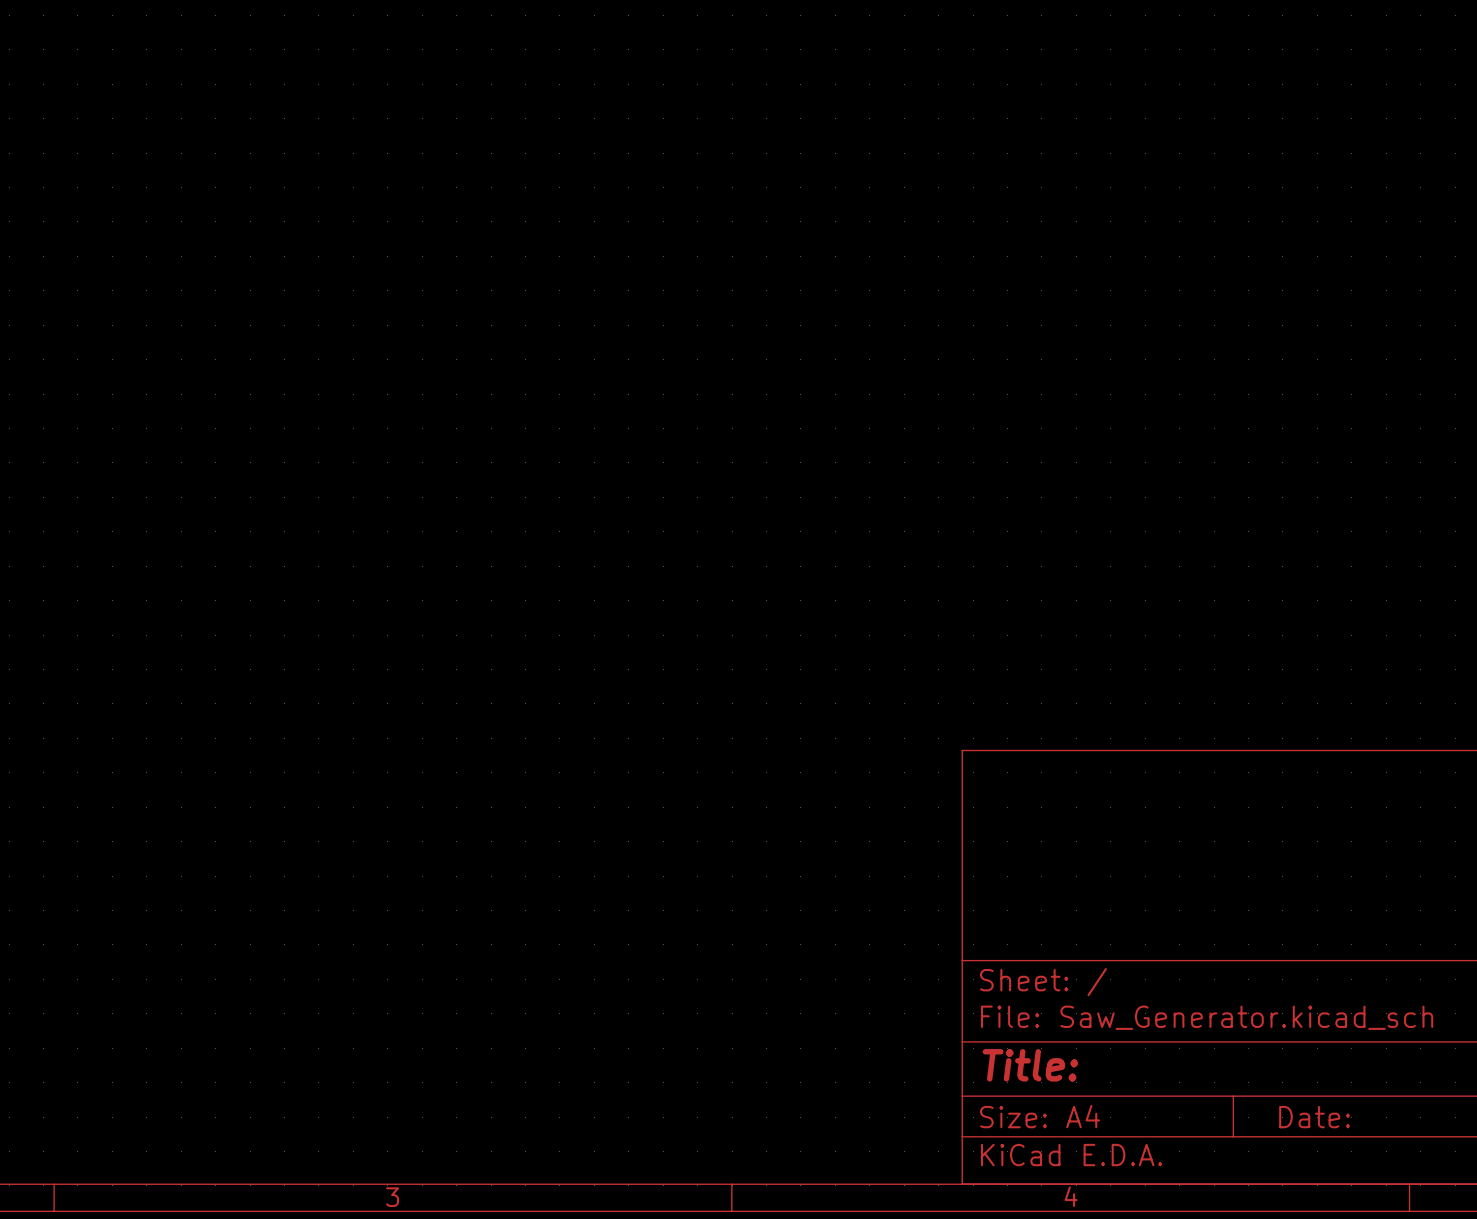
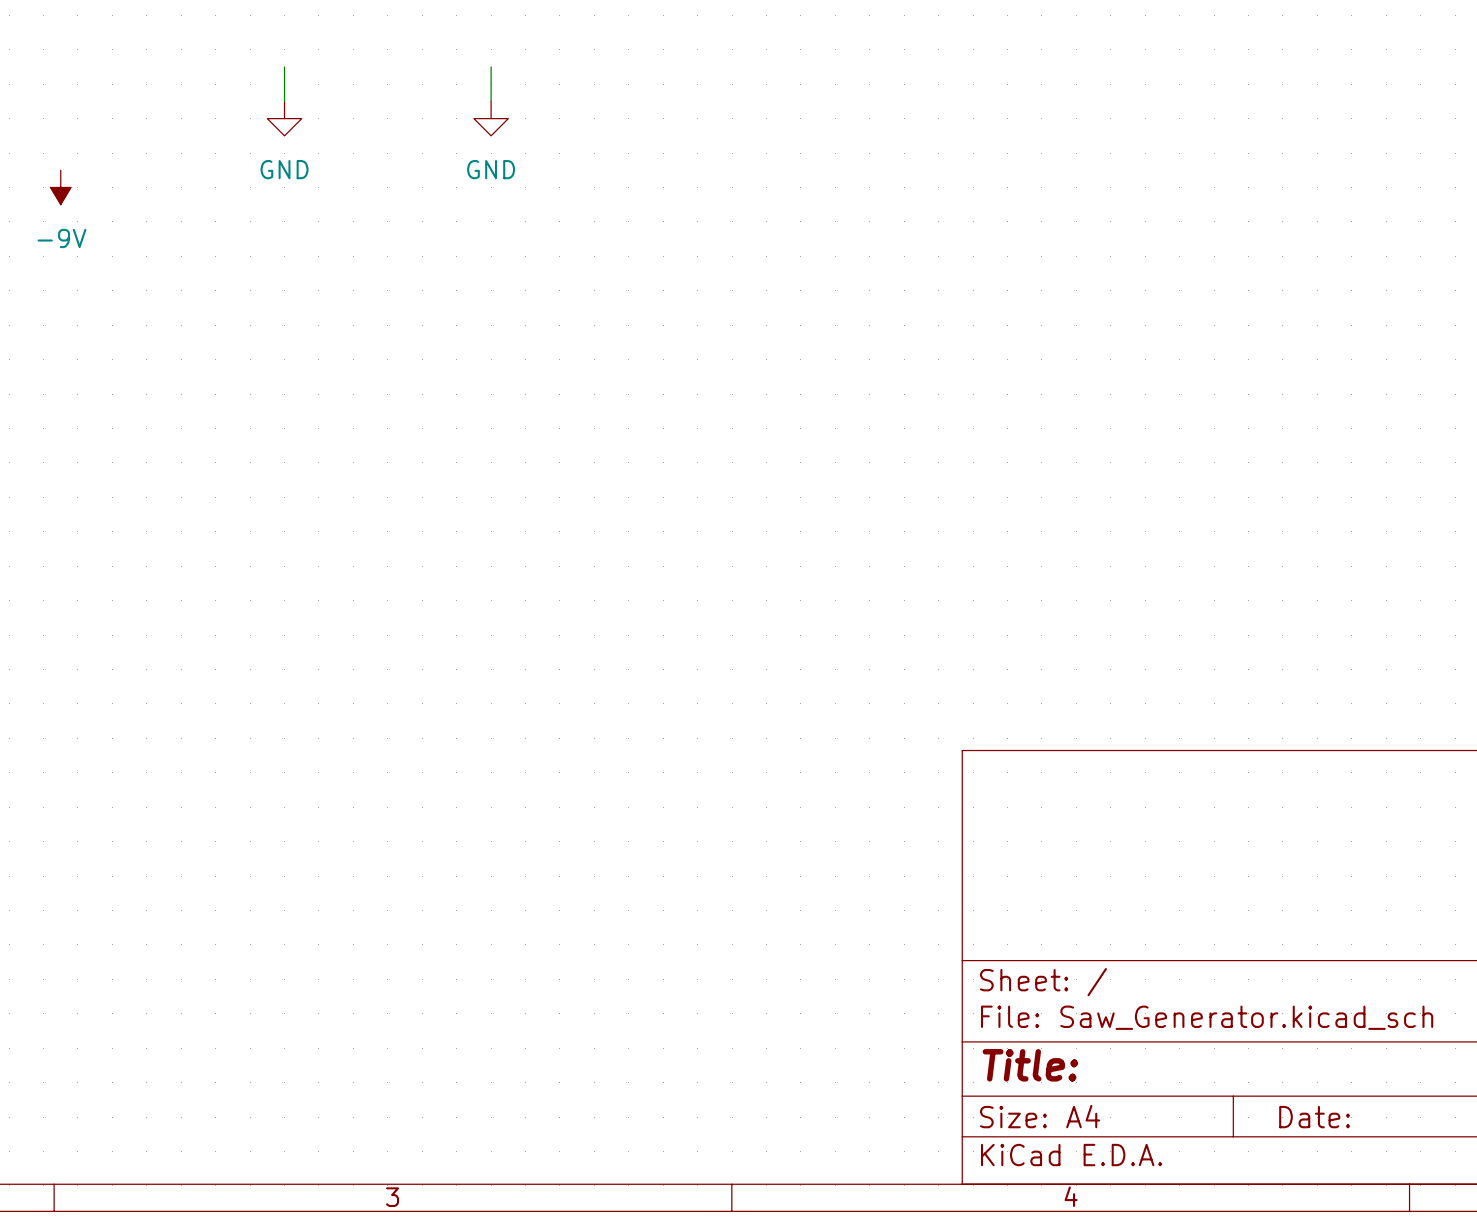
wire: none -> (284, 66) (284, 101)
wire: none -> (491, 66) (491, 101)
power symbol: none -> GND (284, 118)
power symbol: none -> GND (491, 118)
power symbol: none -> -9V (60, 187)

